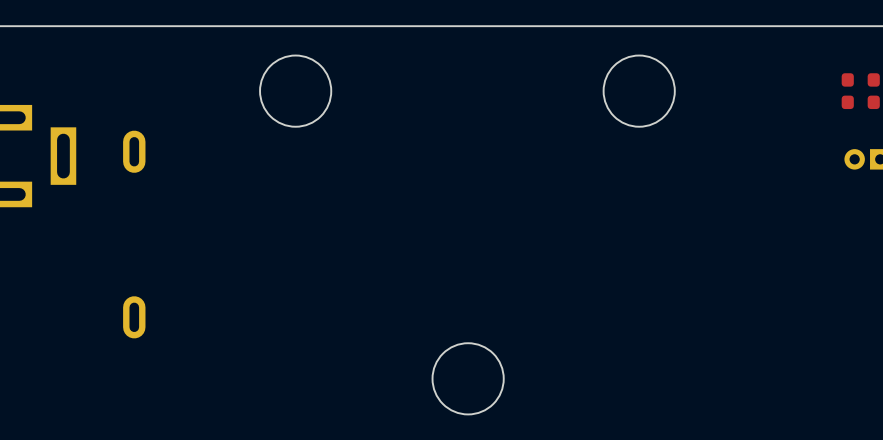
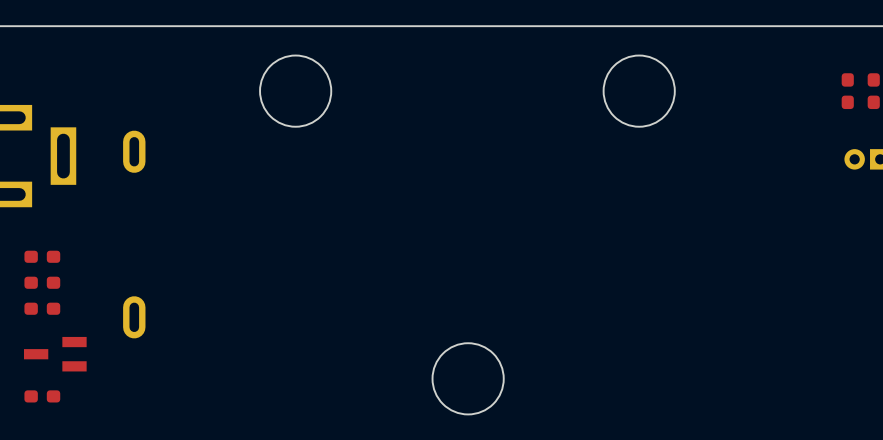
part: none -> (42, 256)
part: none -> (42, 282)
part: none -> (42, 308)
part: none -> (55, 354)
part: none -> (42, 396)

